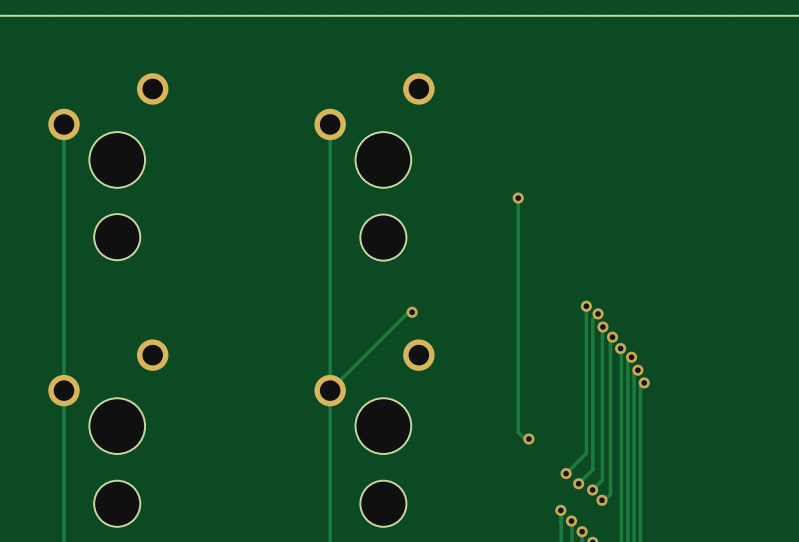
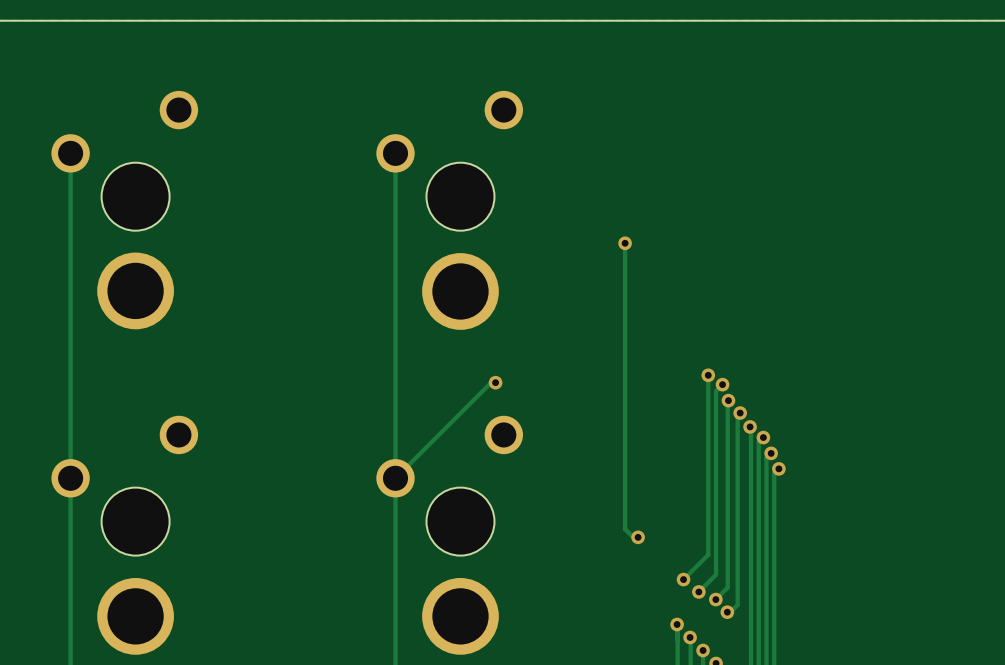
part footprint: [94, 214, 141, 261] -> [97, 252, 174, 330]
part footprint: [360, 214, 407, 261] -> [422, 253, 499, 330]
part footprint: [94, 480, 141, 527] -> [97, 578, 174, 655]
part footprint: [360, 480, 407, 527] -> [422, 578, 499, 655]

